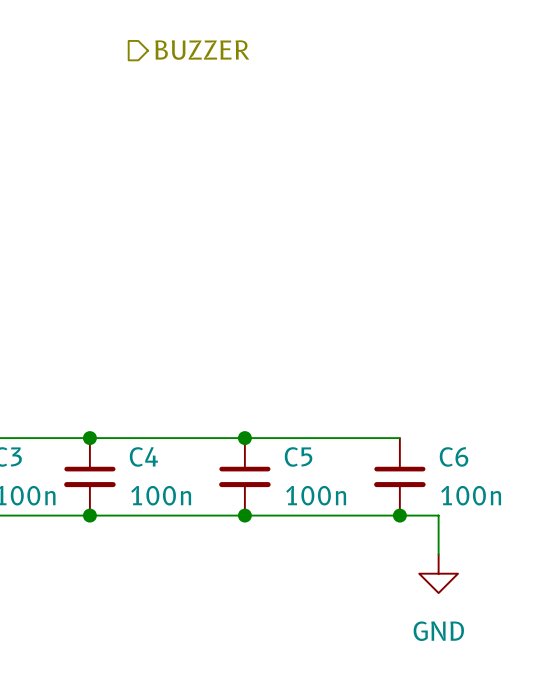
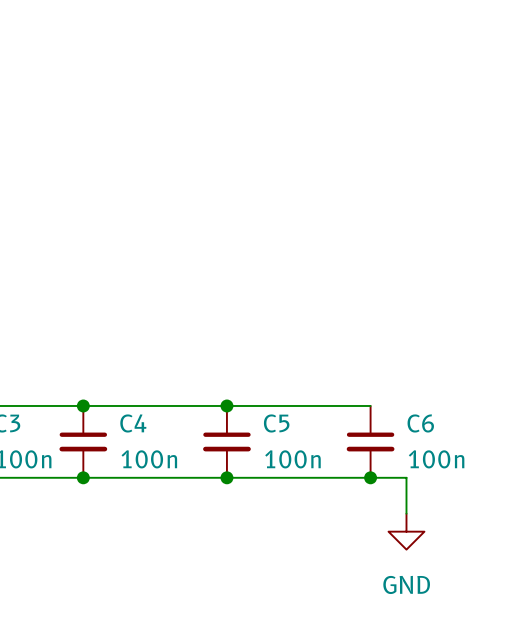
hierarchical label: BUZZER (202, 50) -> none

